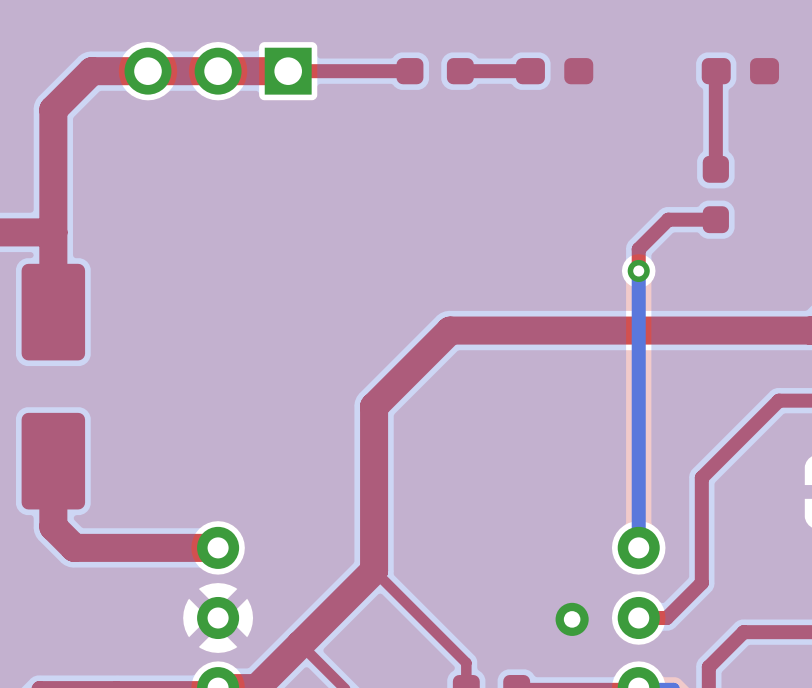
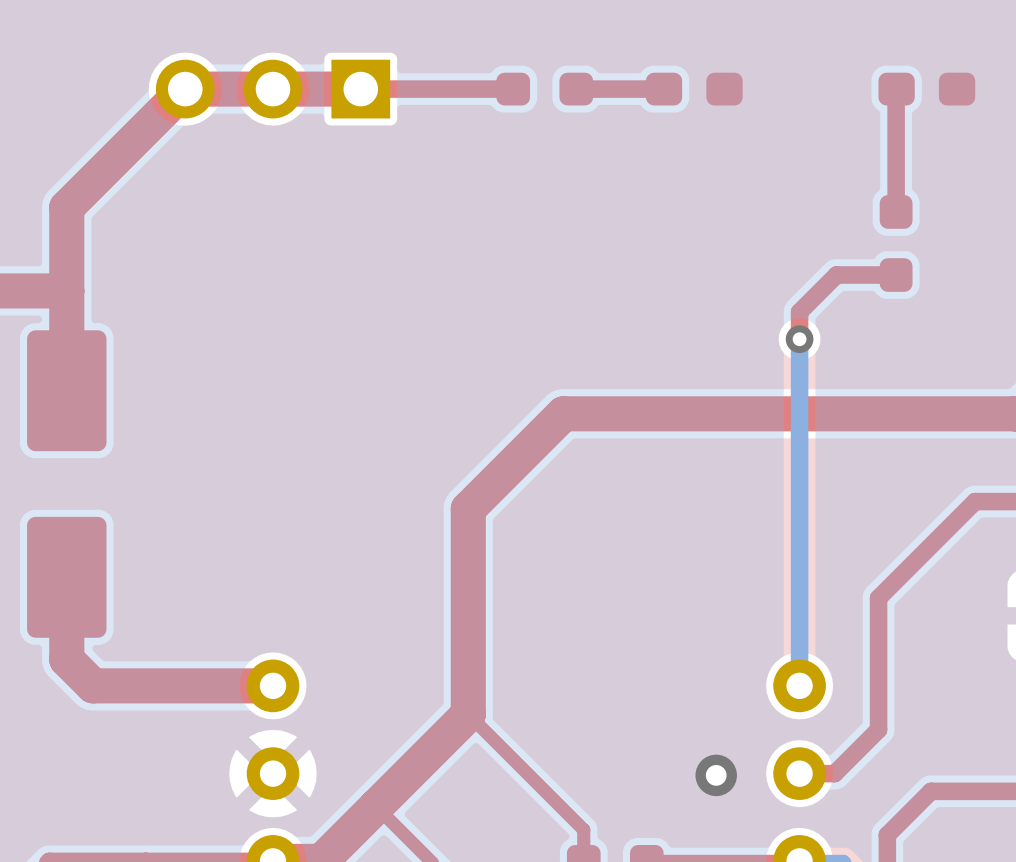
top track: (147, 71) (91, 71) (53, 109) (53, 165) -> (185, 89) (66, 207)

